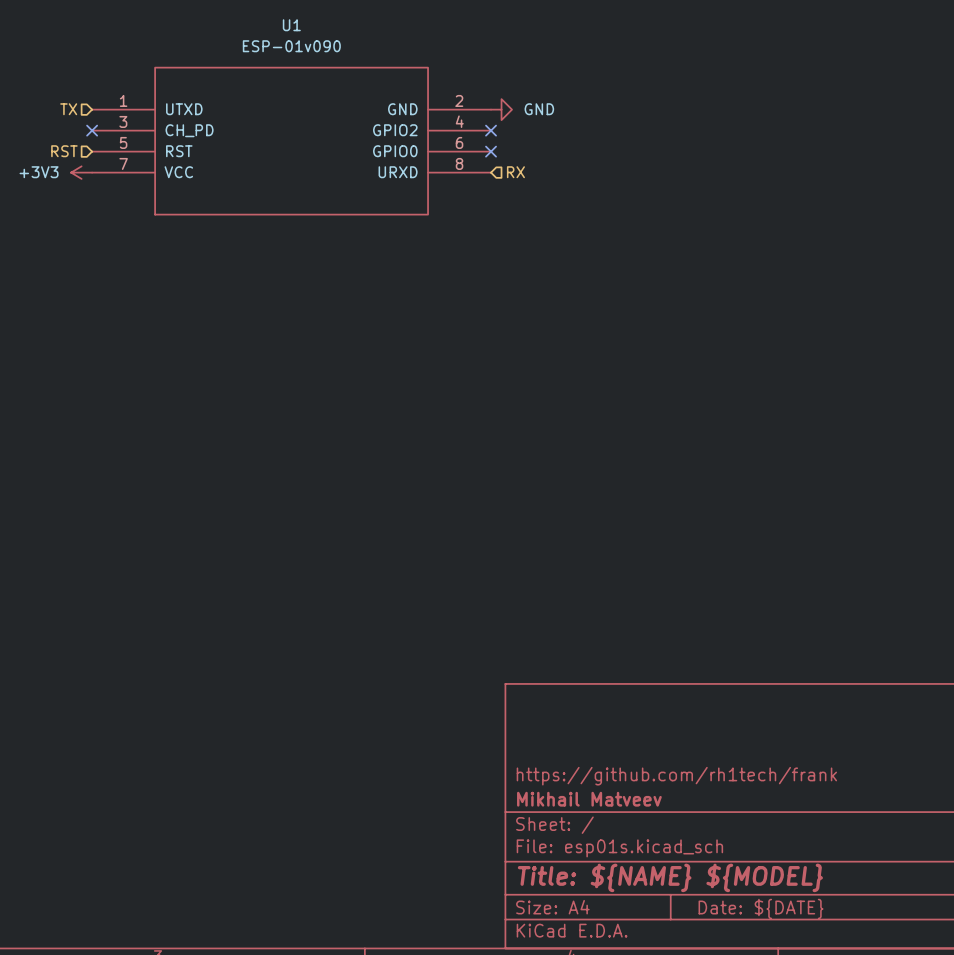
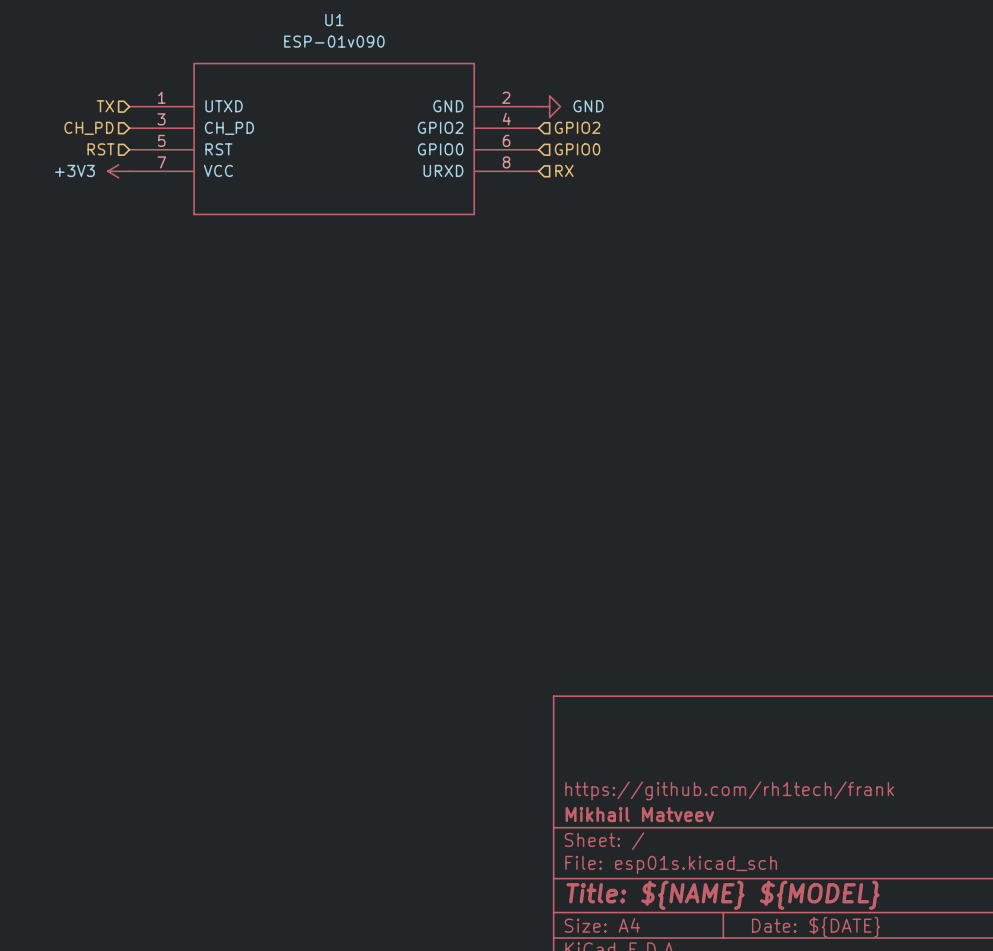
hierarchical label: none -> CH_PD (88, 128)
no-connect mark: (92, 130) -> none
no-connect mark: (491, 130) -> none
hierarchical label: none -> GPIO2 (577, 127)
no-connect mark: (491, 151) -> none
hierarchical label: none -> GPIO0 (577, 149)

